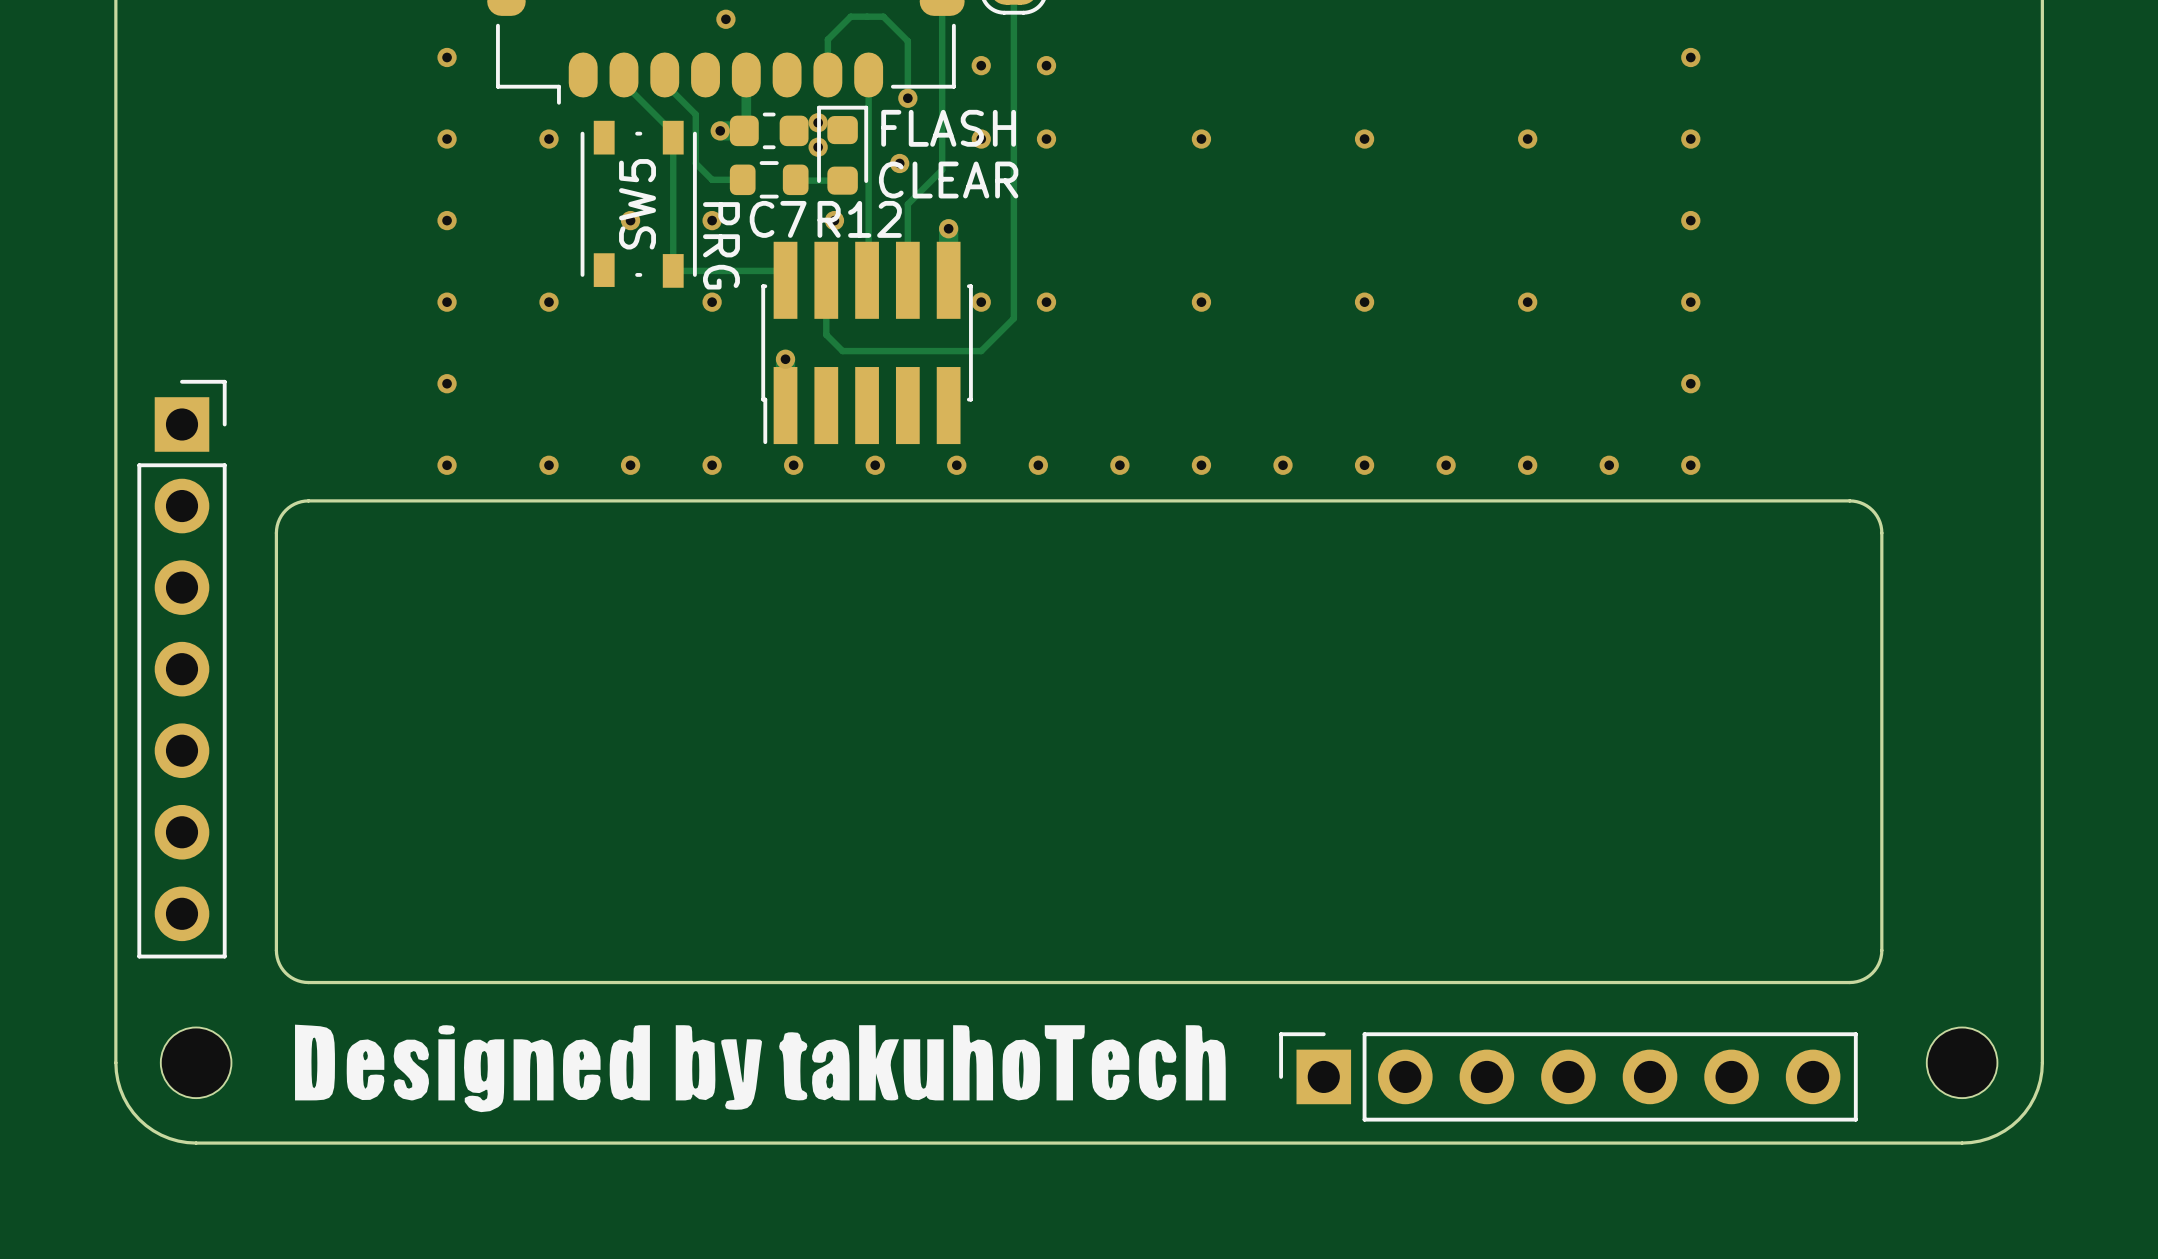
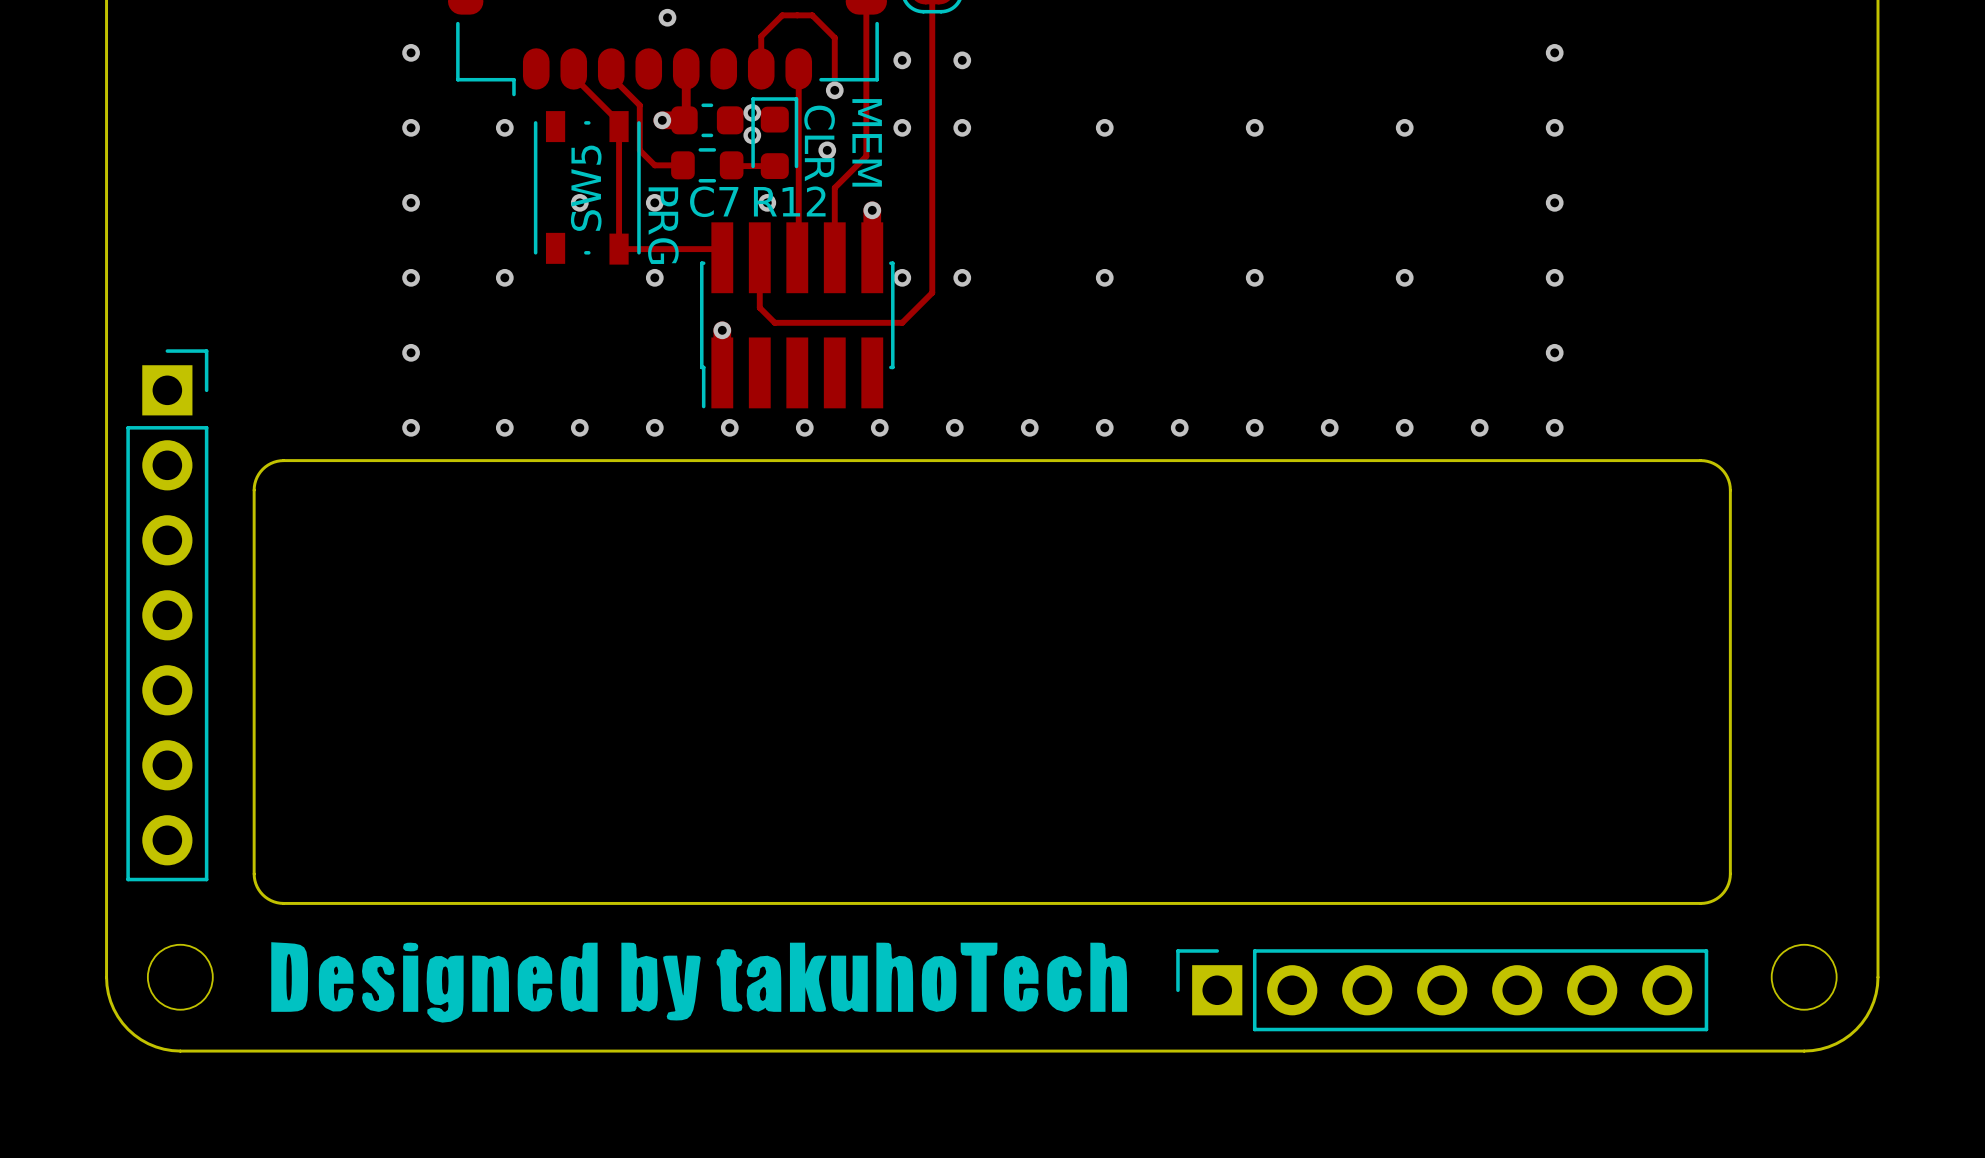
text: FLASH (948, 128) -> none
text: none -> MEM (867, 142)
text: CLEAR (948, 180) -> CLR (819, 143)

